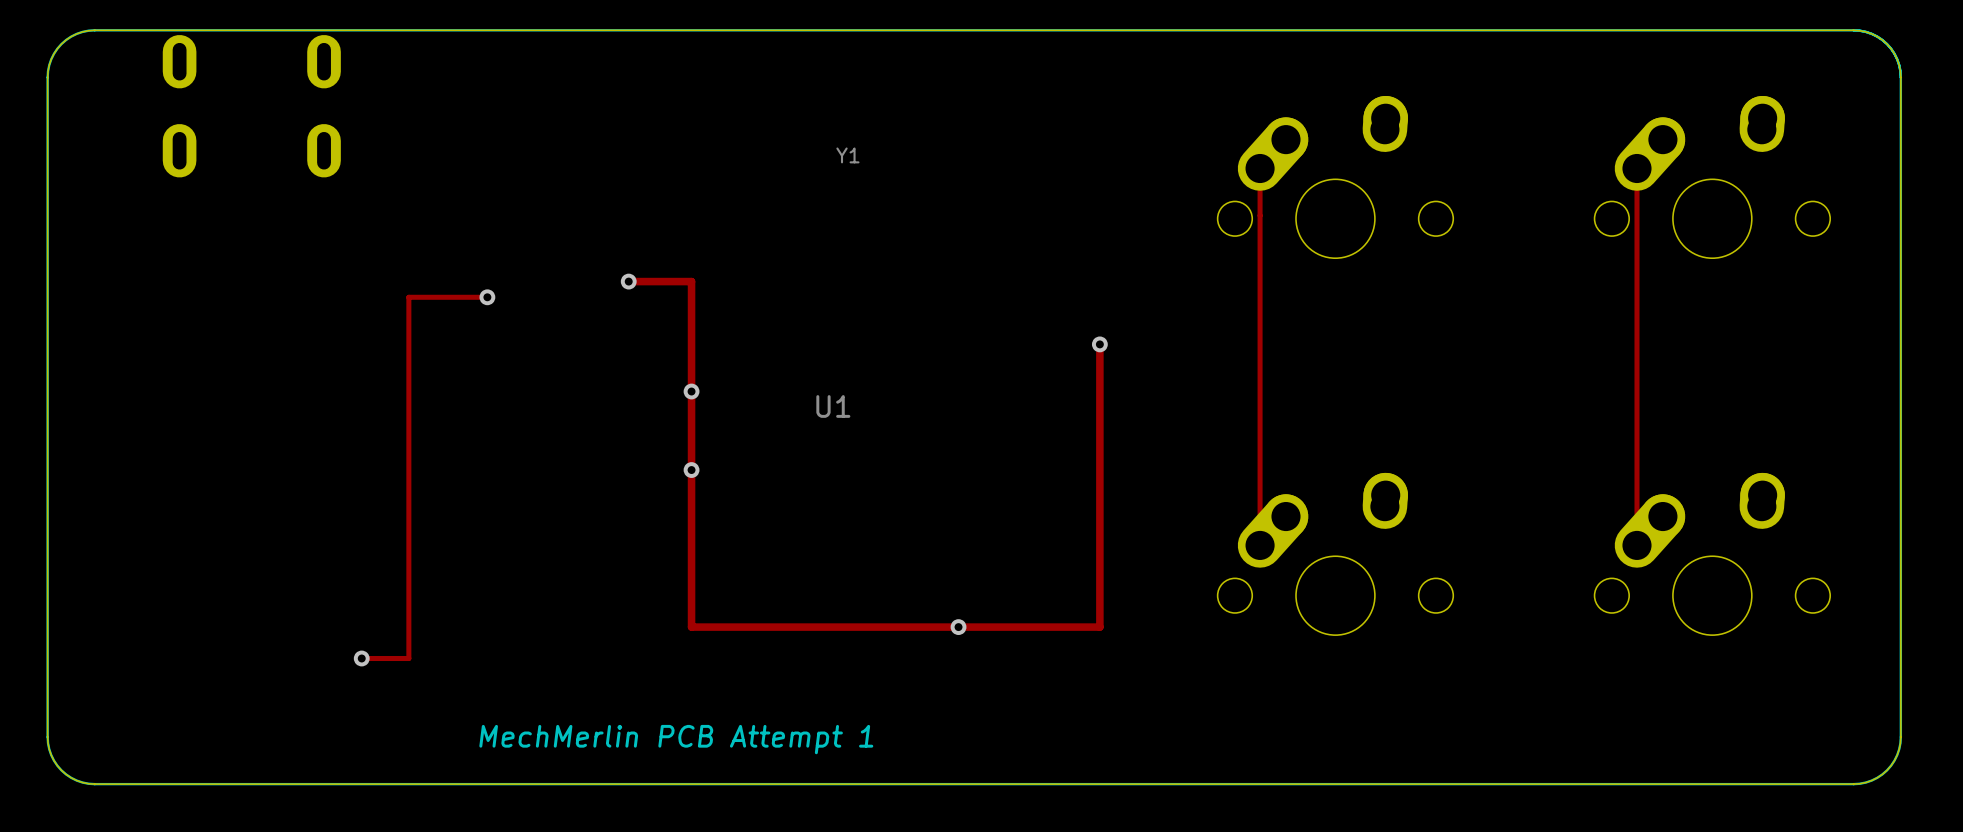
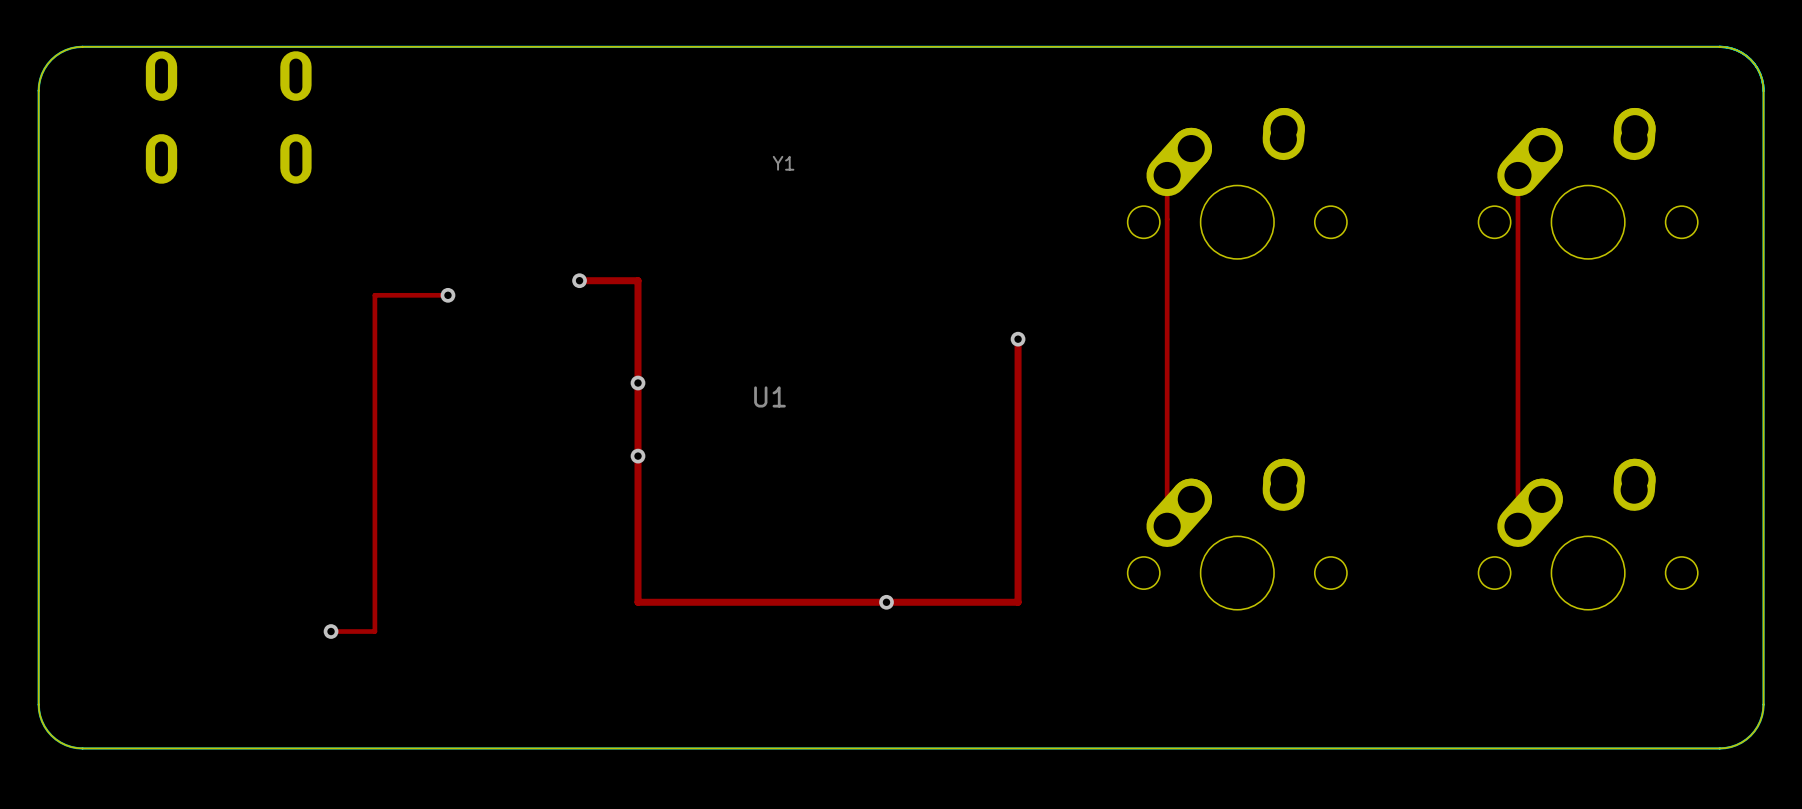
text: MechMerlin PCB Attempt 1 (676, 739) -> none

